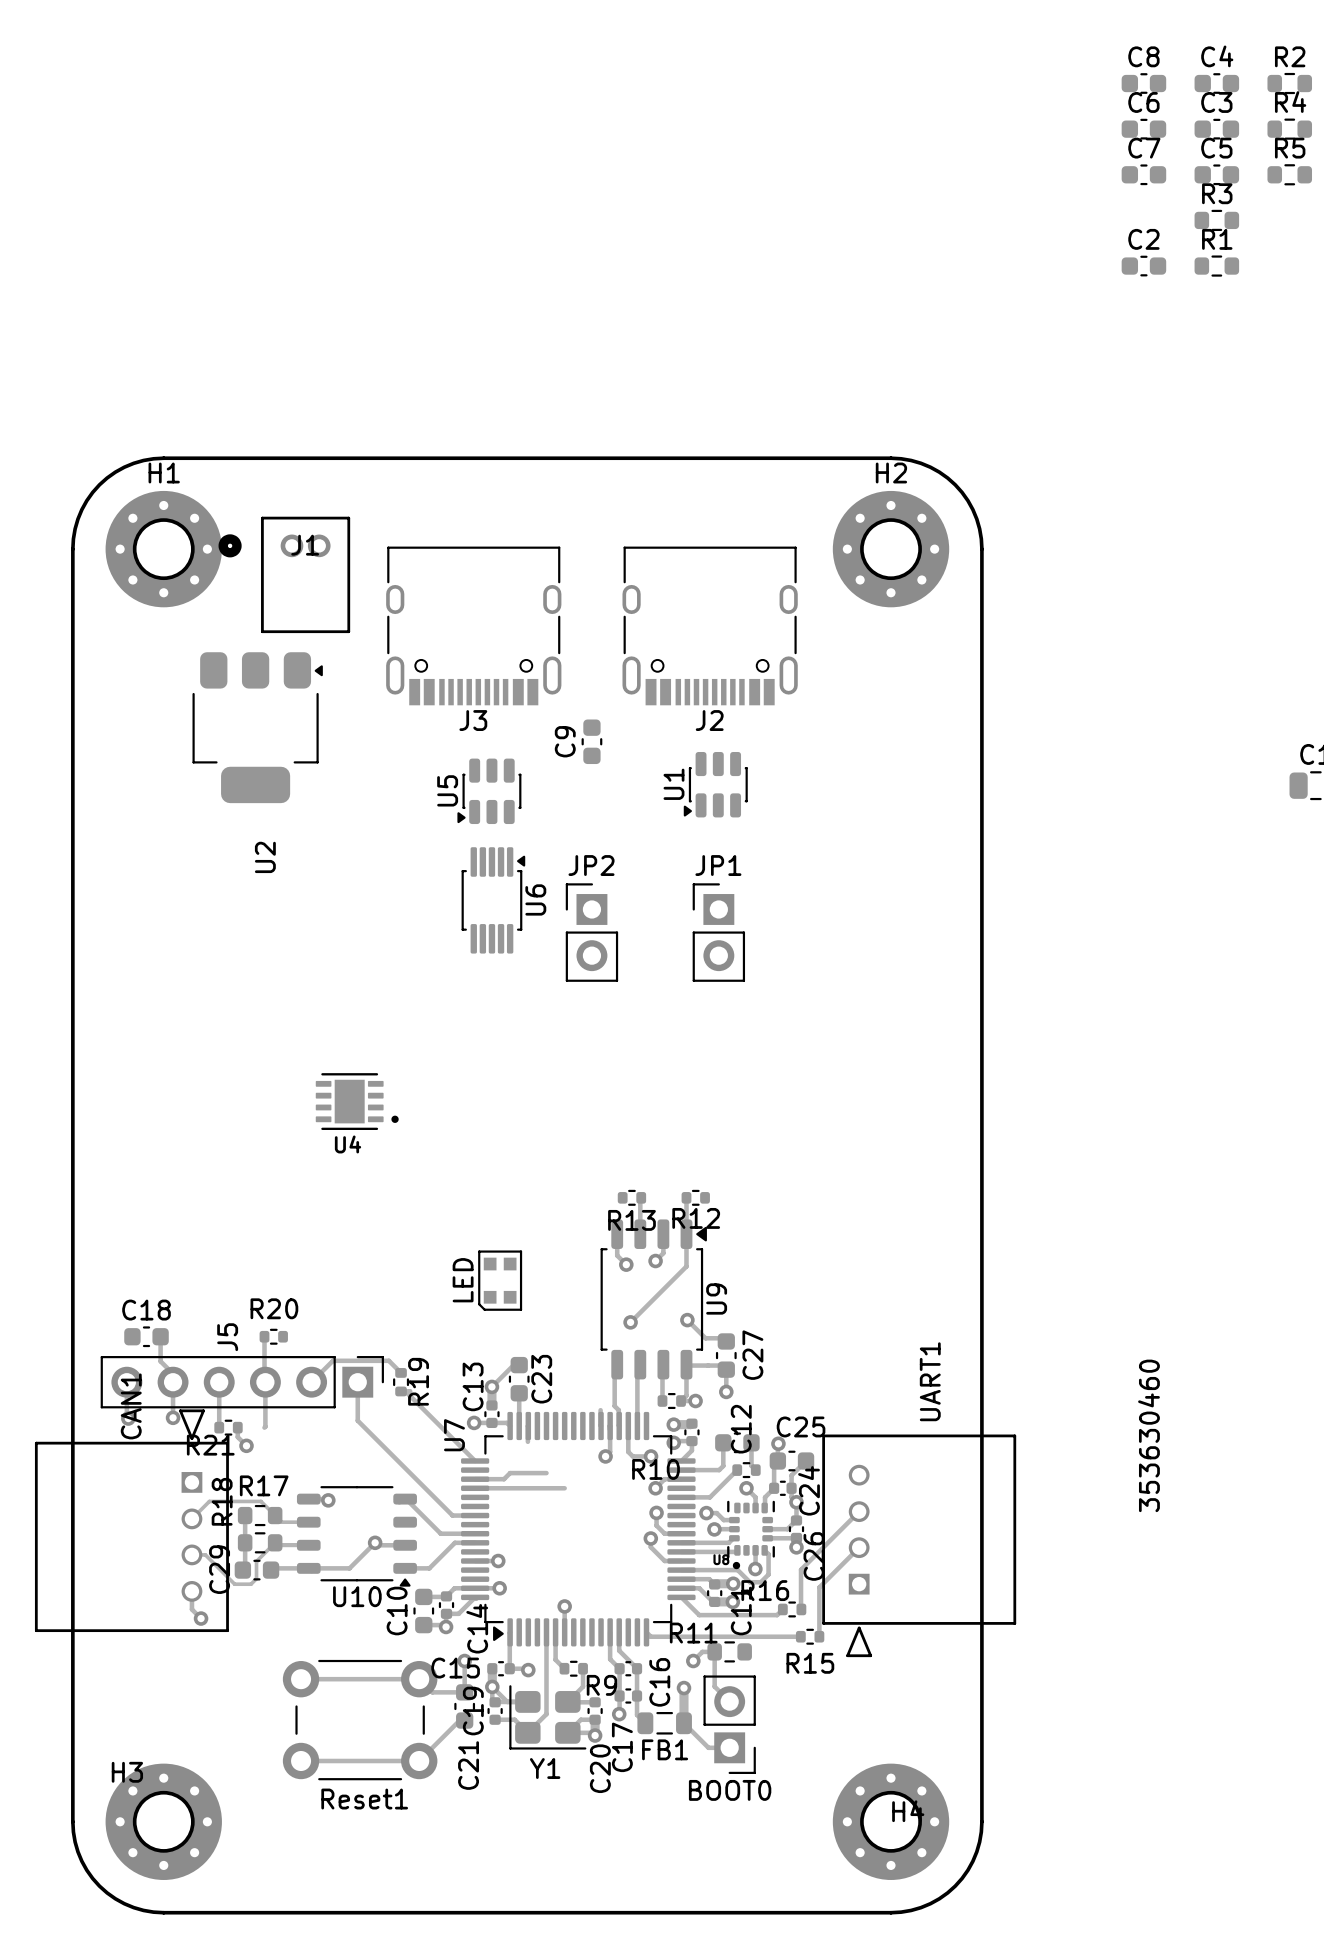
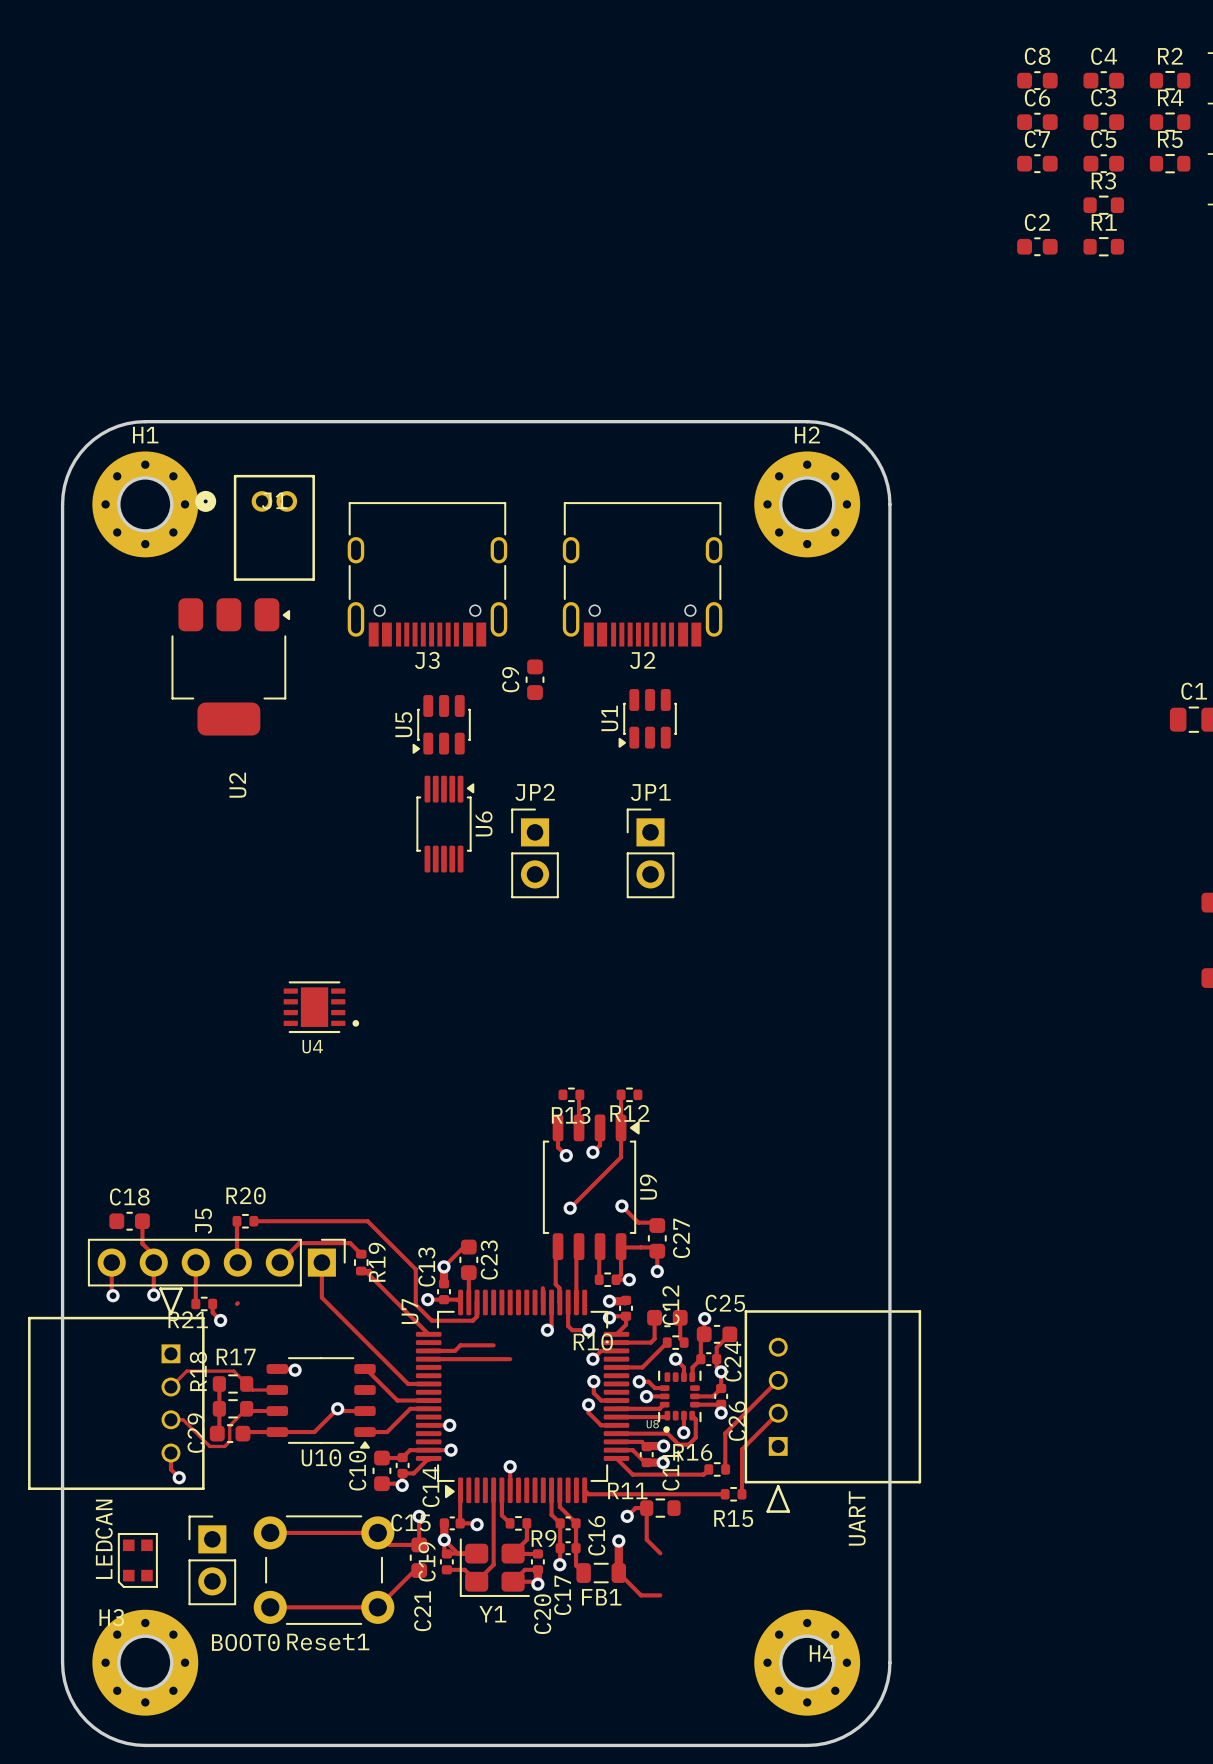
LED: (500, 1280) -> none
track: none -> (253, 1221) (367, 1221) (415, 1269) (415, 1304) (431, 1320) (472, 1320) (477, 1316) (477, 1302)
UART1 name: UART1 (930, 1381) -> UART (857, 1518)
track: (265, 1382) (265, 1426) -> none
CAN1 name: CAN1 (131, 1406) -> CAN (104, 1519)
UART1 text: 353630460 (1148, 1435) -> none
LED: none -> (137, 1560)
BOOT0 rotation: 0° (729, 1724) -> 180° (212, 1560)
BOOT0 position: (729, 1724) -> (212, 1560)
BOOT0 name position: BOOT0 (730, 1790) -> BOOT0 (245, 1642)

